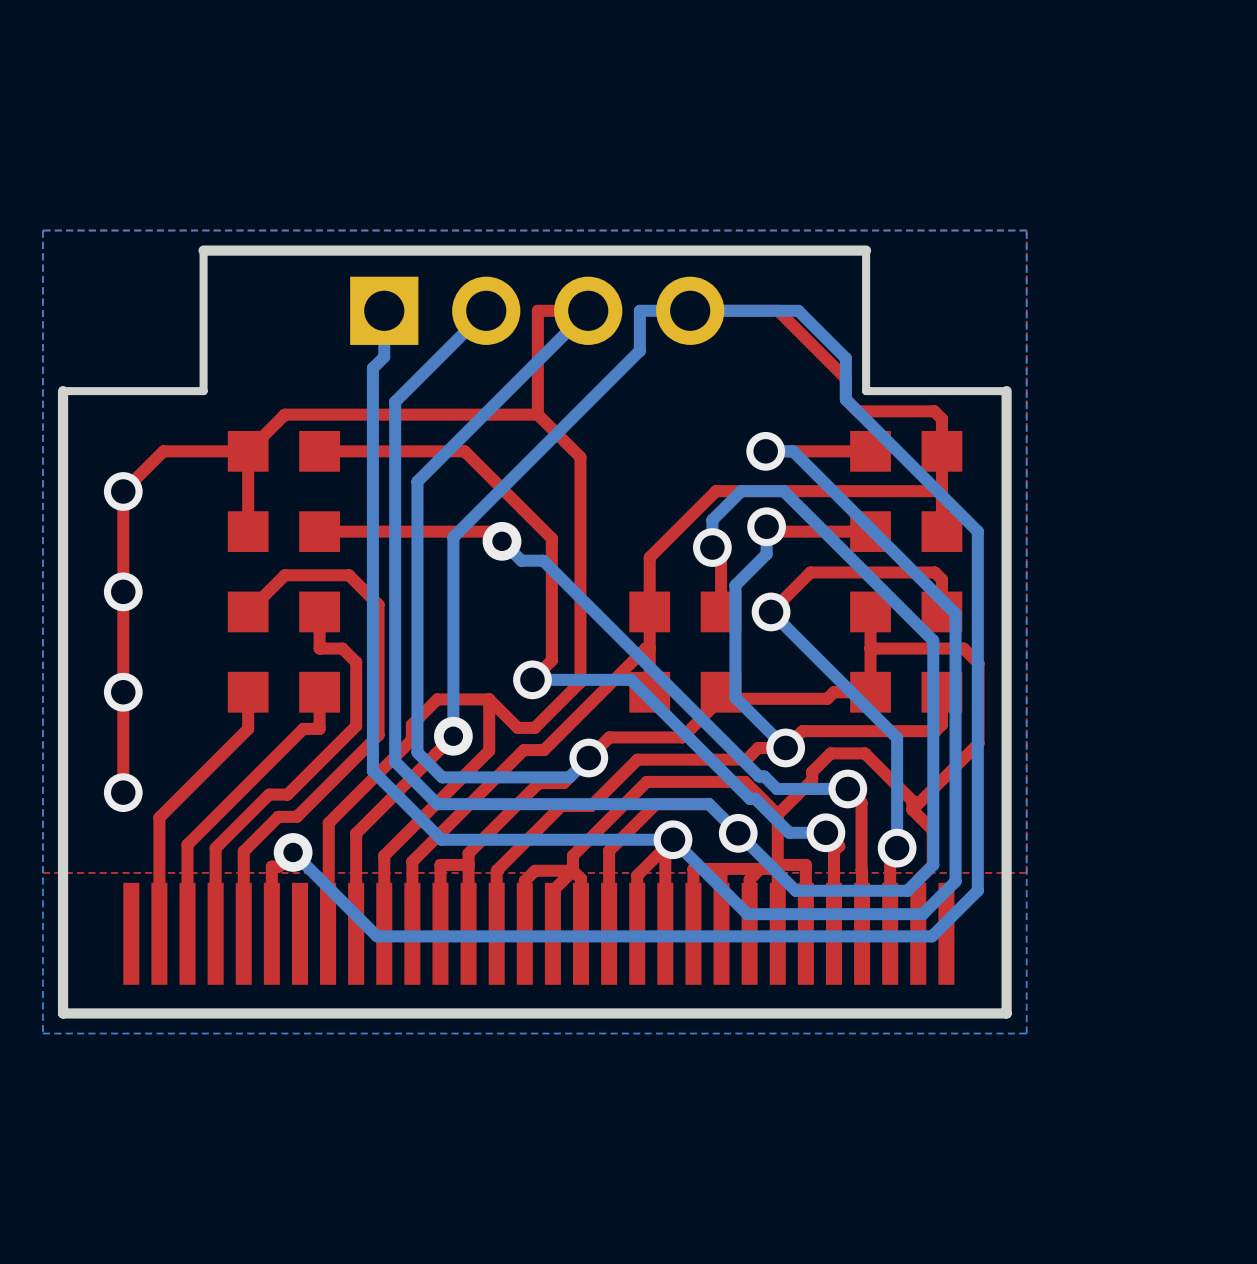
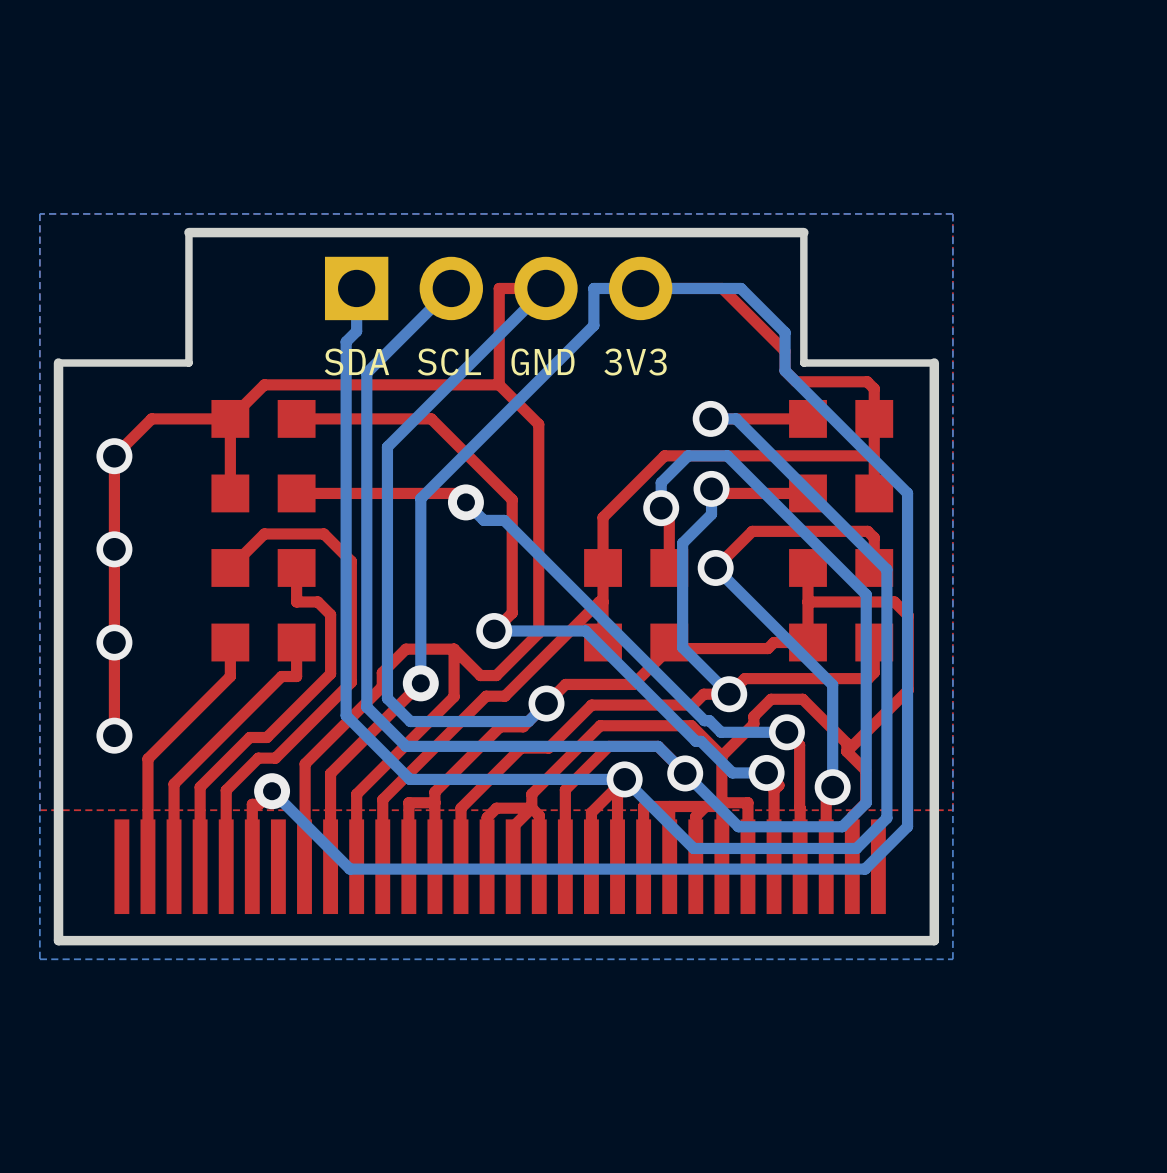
text: none -> SDA (356, 362)
text: none -> SCL (449, 362)
text: none -> GND (542, 362)
text: none -> 3V3 (635, 362)

